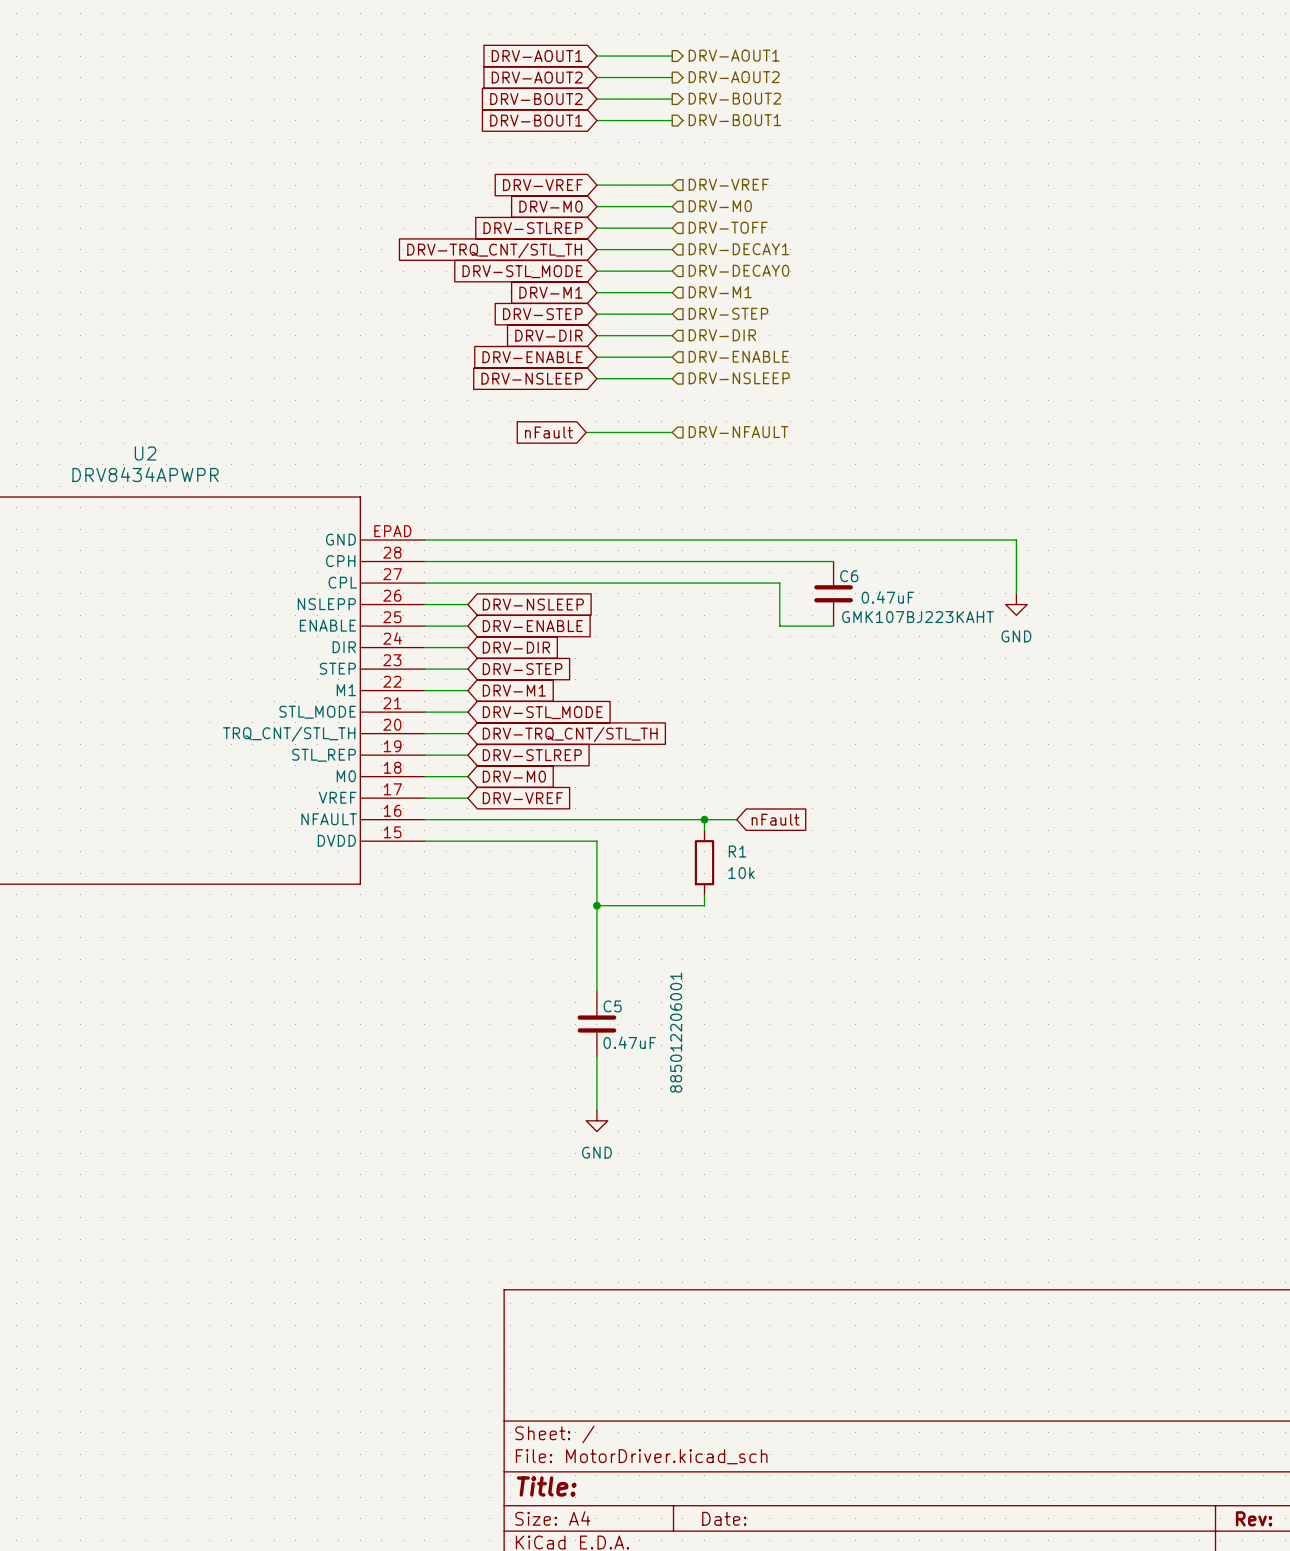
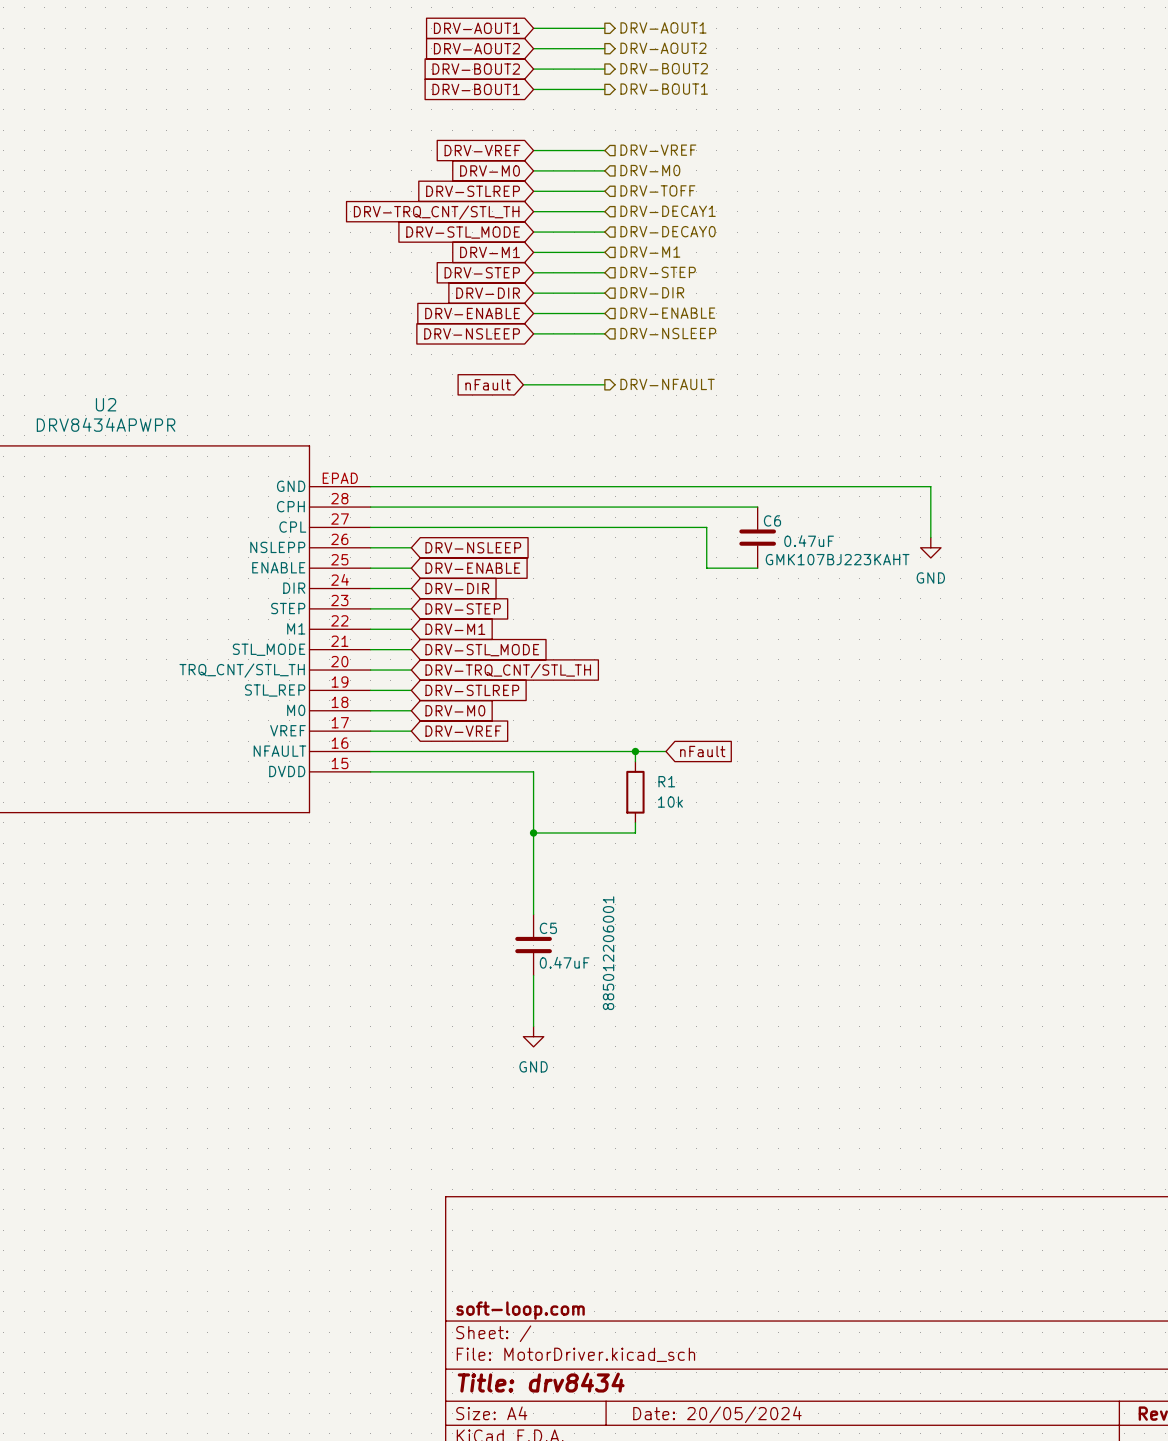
hierarchical label shape: input (738, 432) -> output (667, 384)
title block: none -> soft-loop.com (520, 1310)
title block: Title: (546, 1486) -> Title: drv8434 (541, 1382)
title block: Date: (724, 1518) -> Date: 20/05/2024 (717, 1414)

